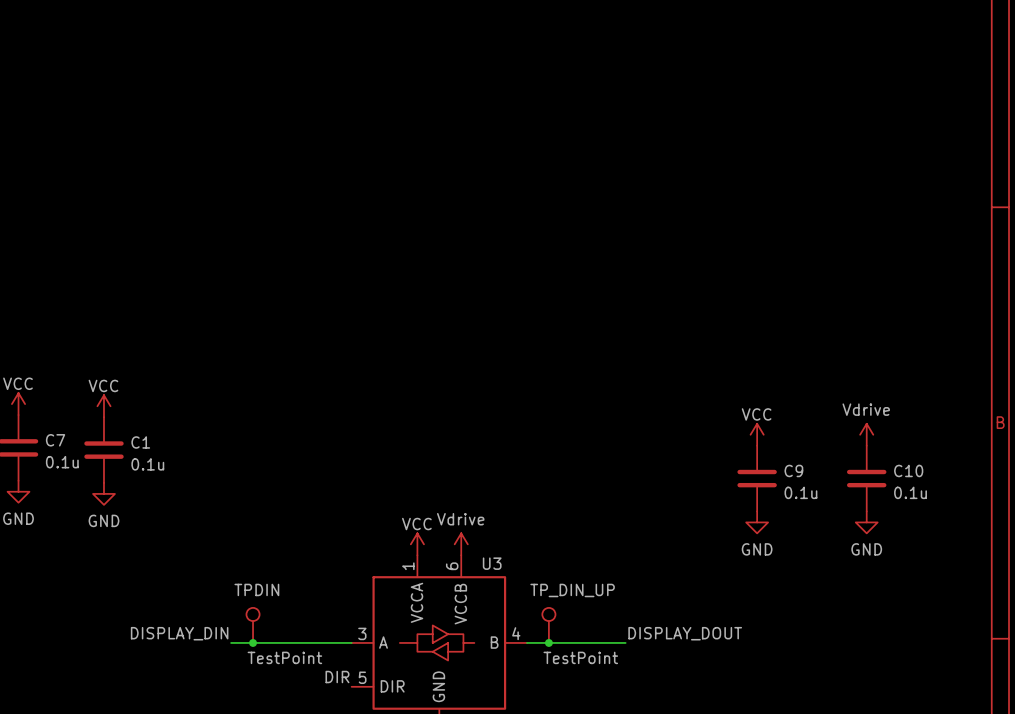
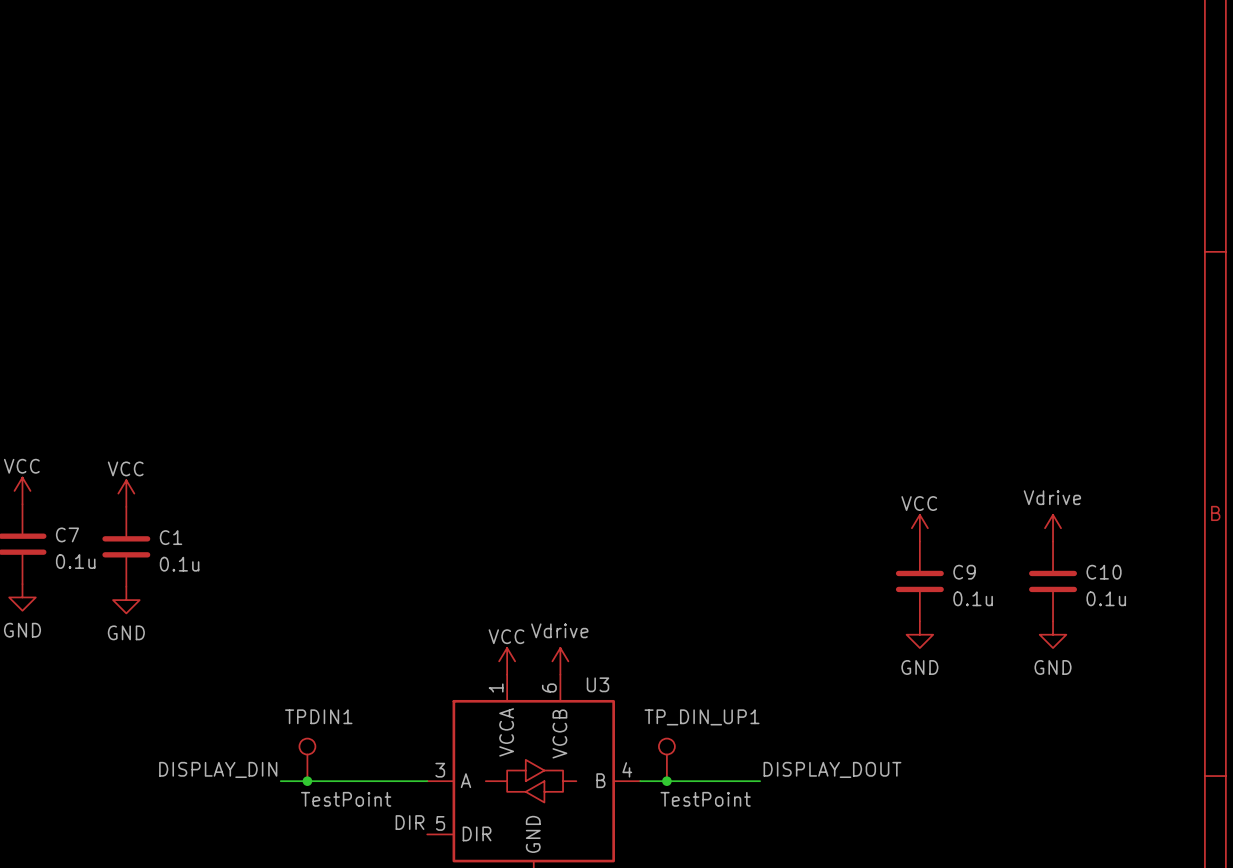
TPDIN name: TPDIN (256, 589) -> TPDIN1 (318, 716)
TP_DIN_UP name: TP_DIN_UP (572, 590) -> TP_DIN_UP1 (702, 717)

